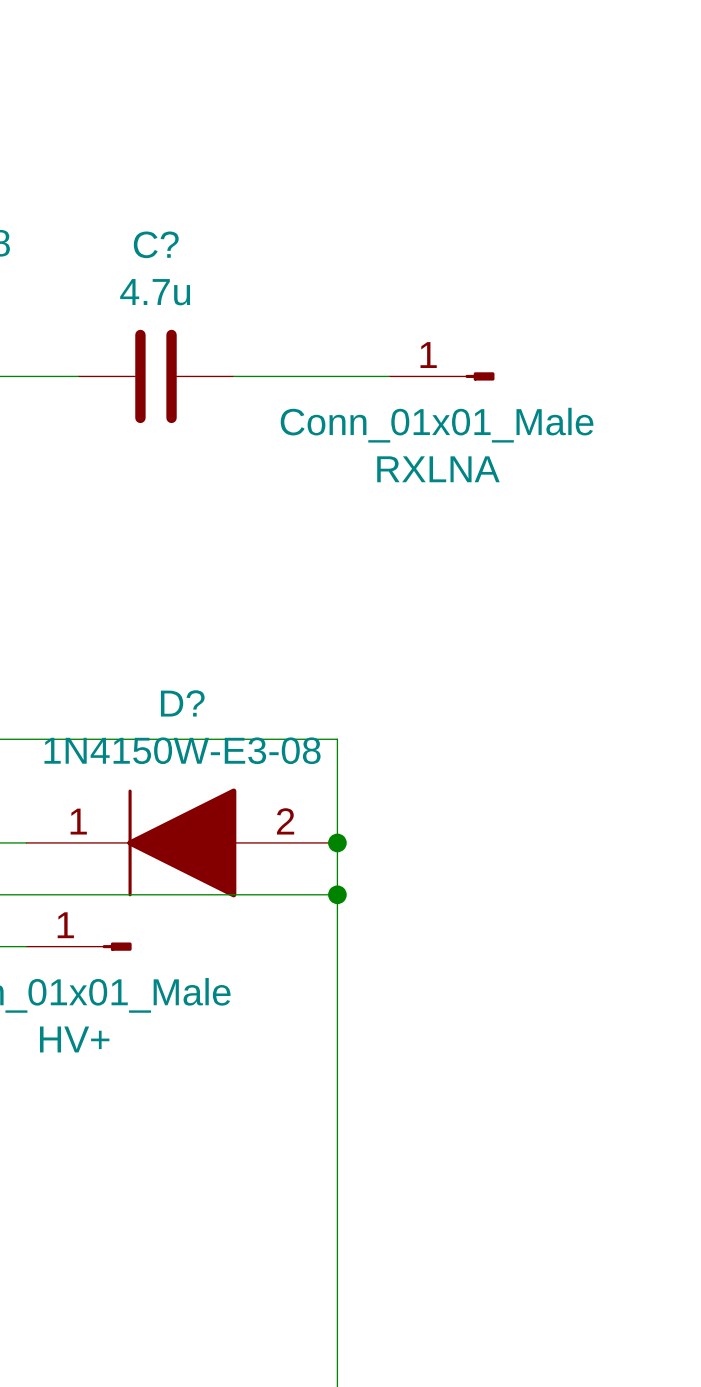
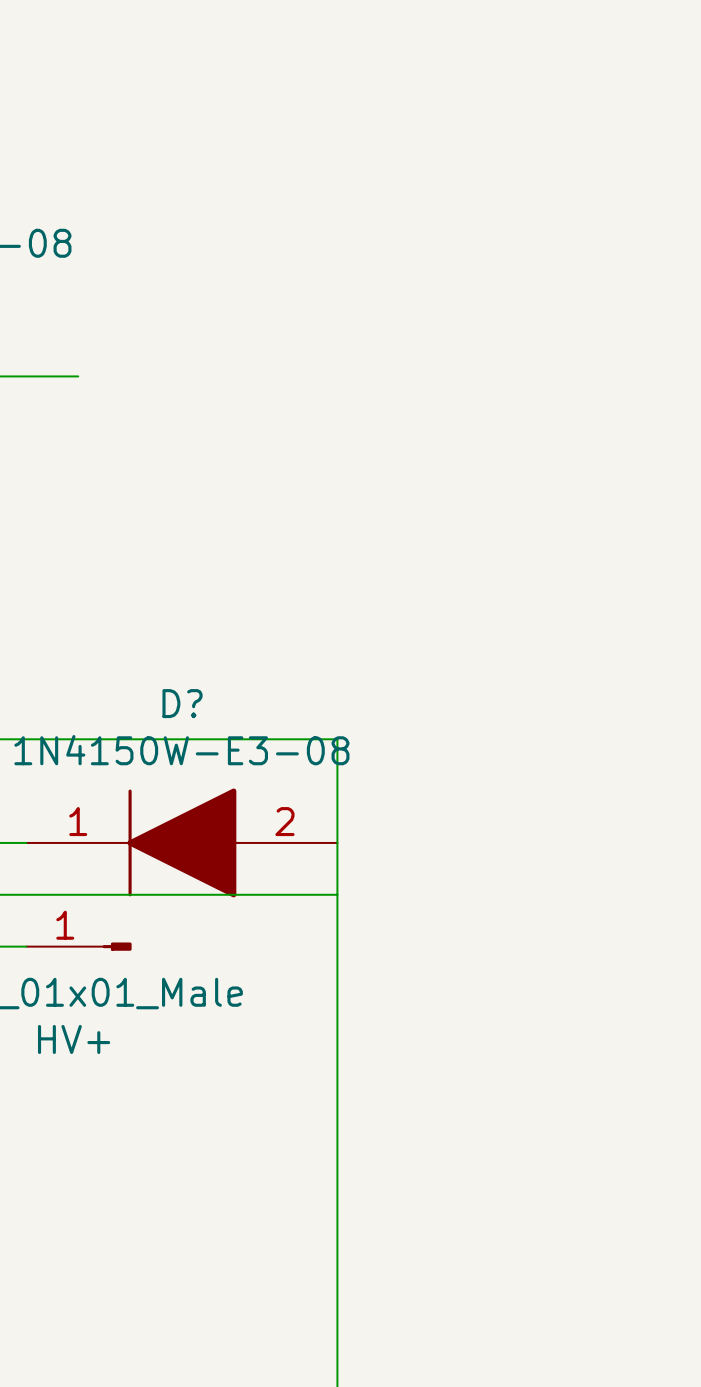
C?: 4.7u (155, 376) -> none
wire: (233, 376) (389, 376) -> none
RXLNA: Conn_01x01_Male (441, 376) -> none
junction: (337, 842) -> none
junction: (337, 894) -> none

